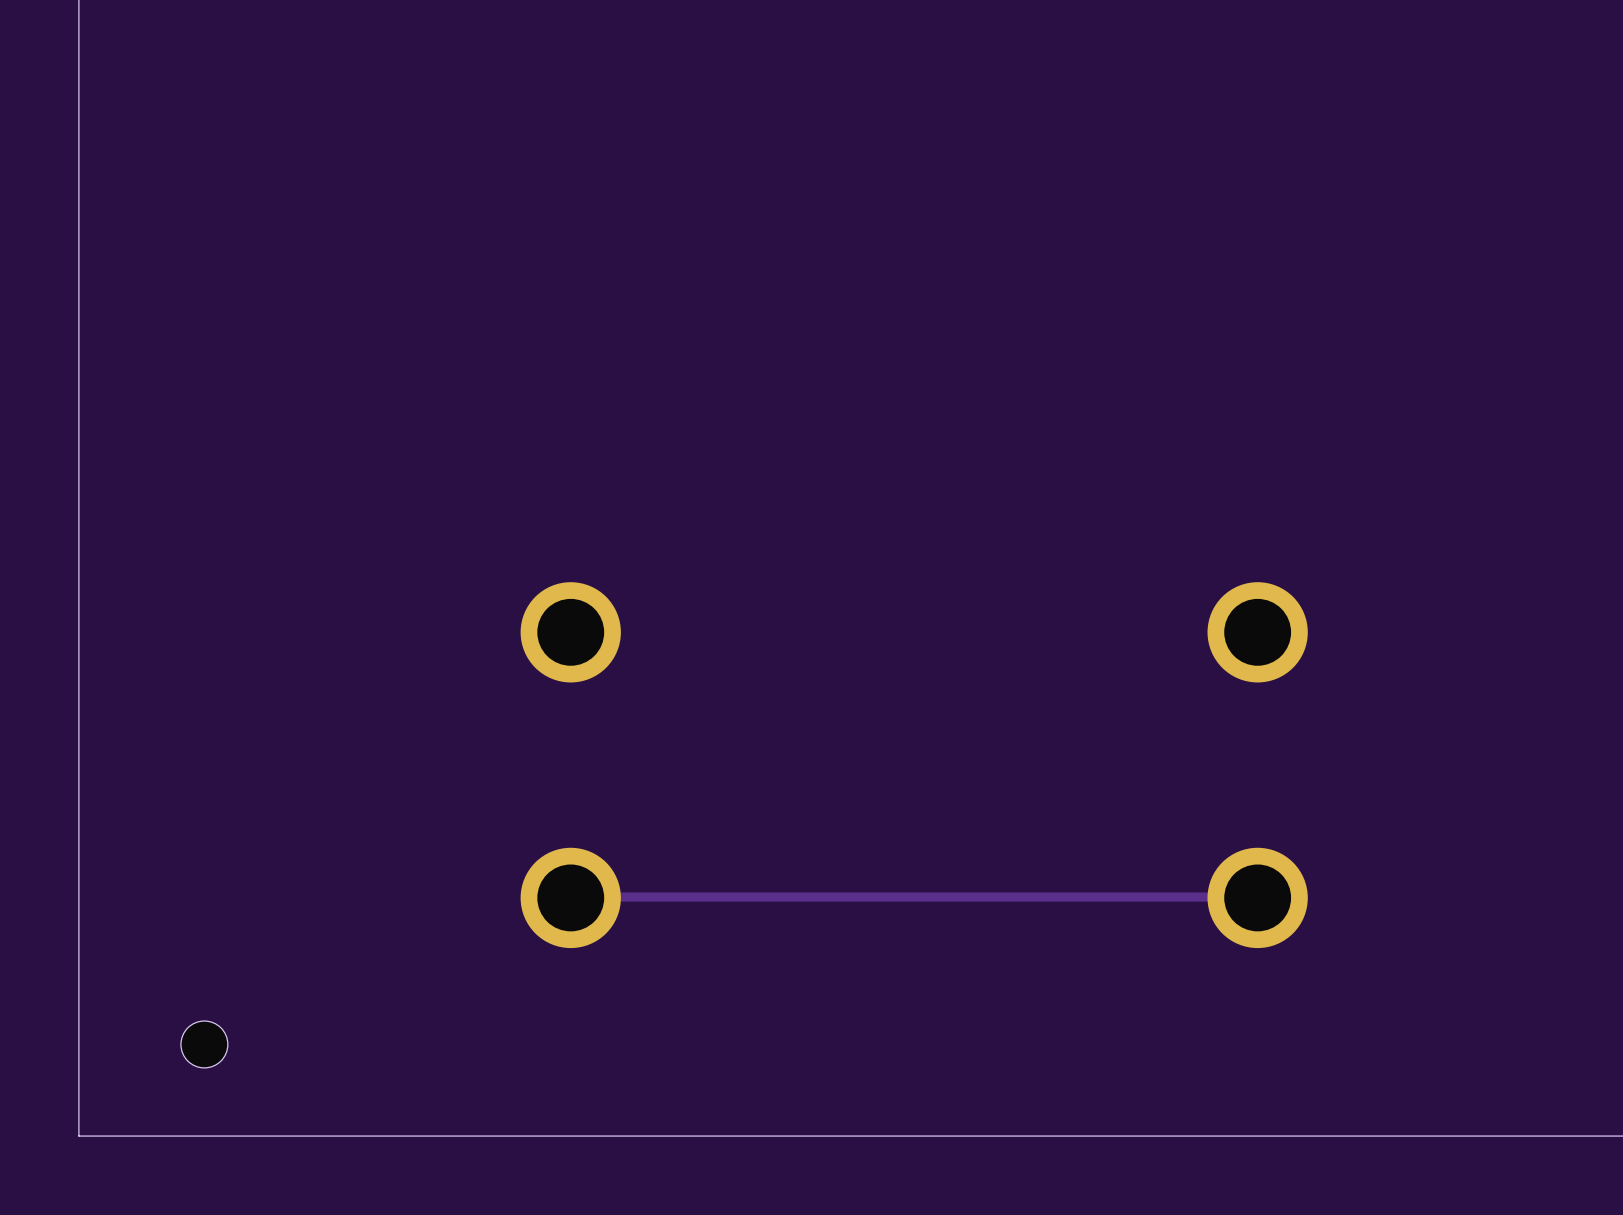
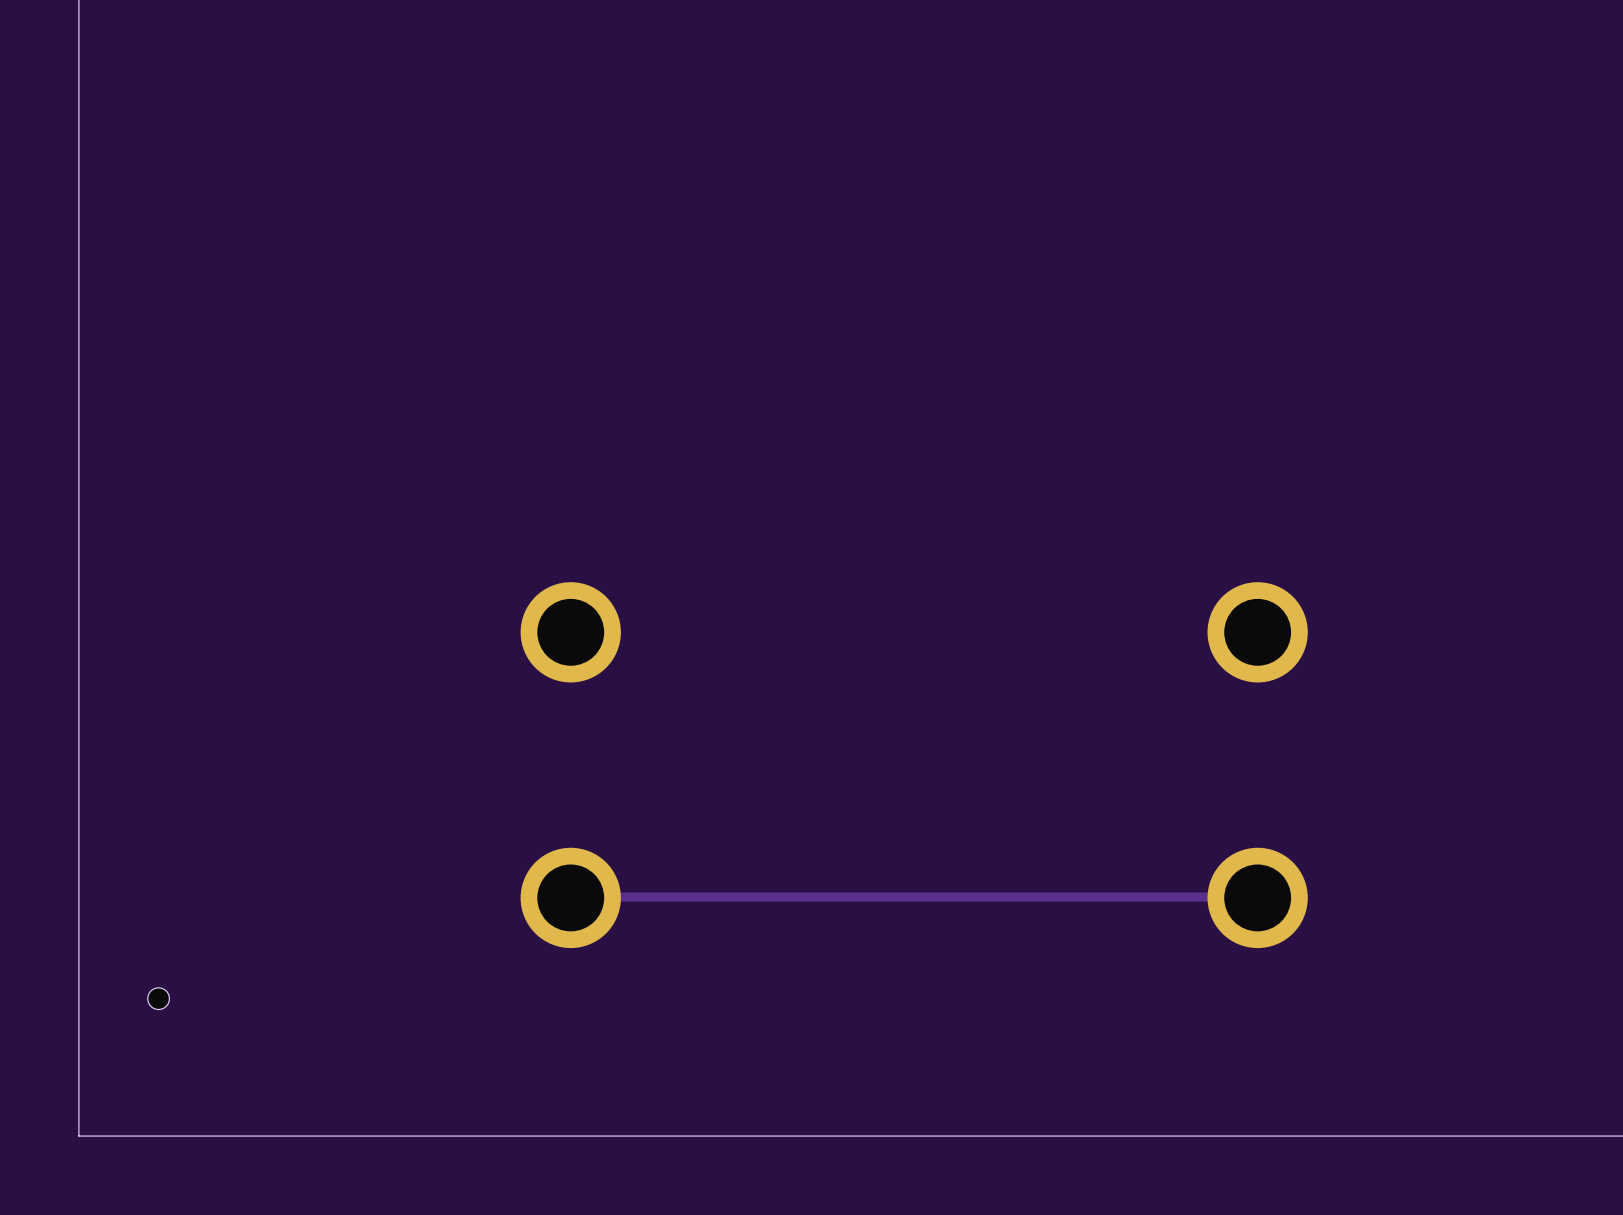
hole: none -> (158, 998)
hole: (204, 1044) -> none

